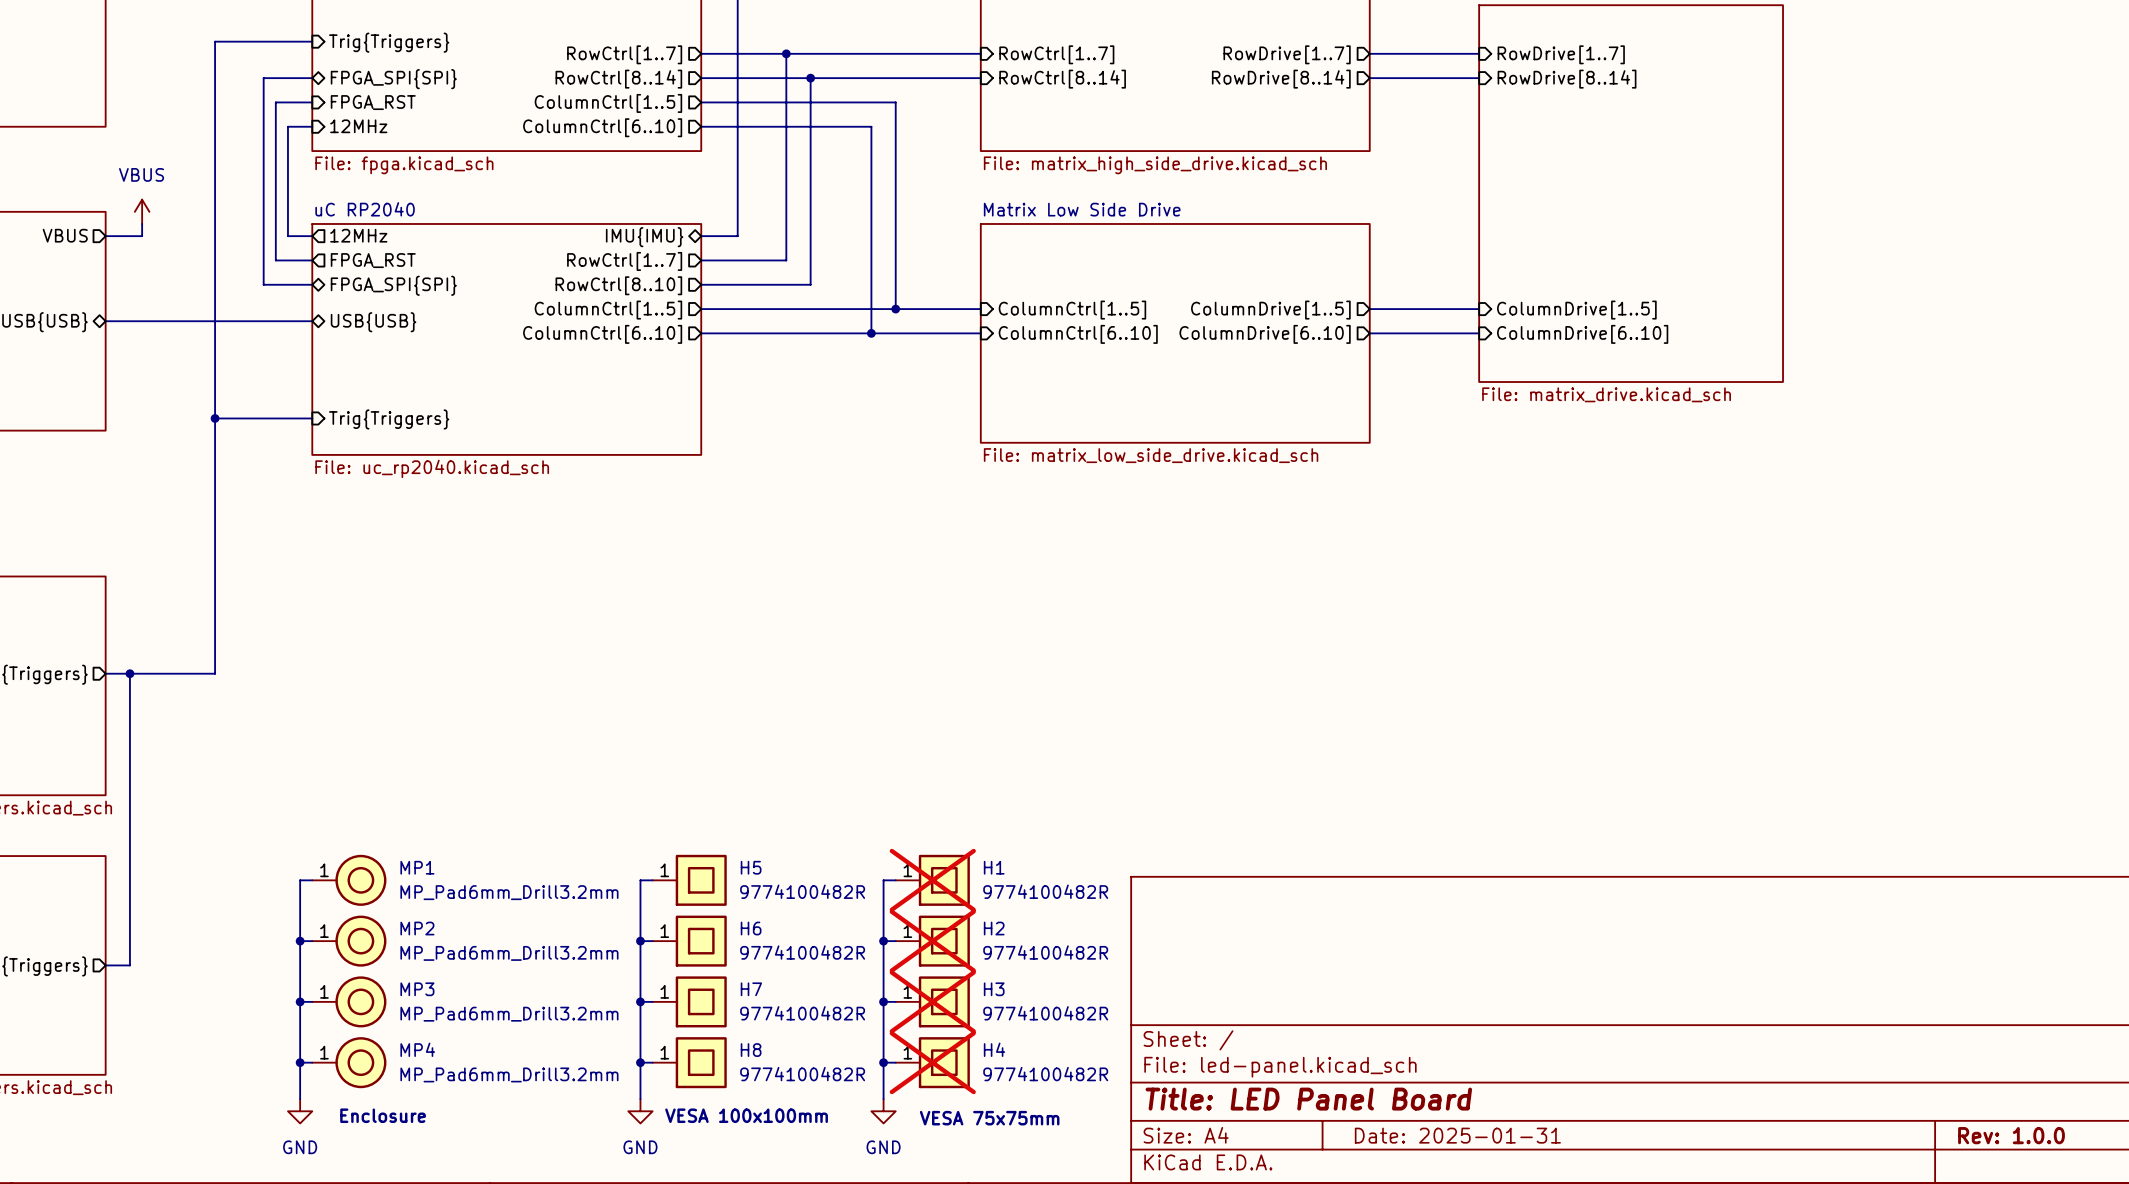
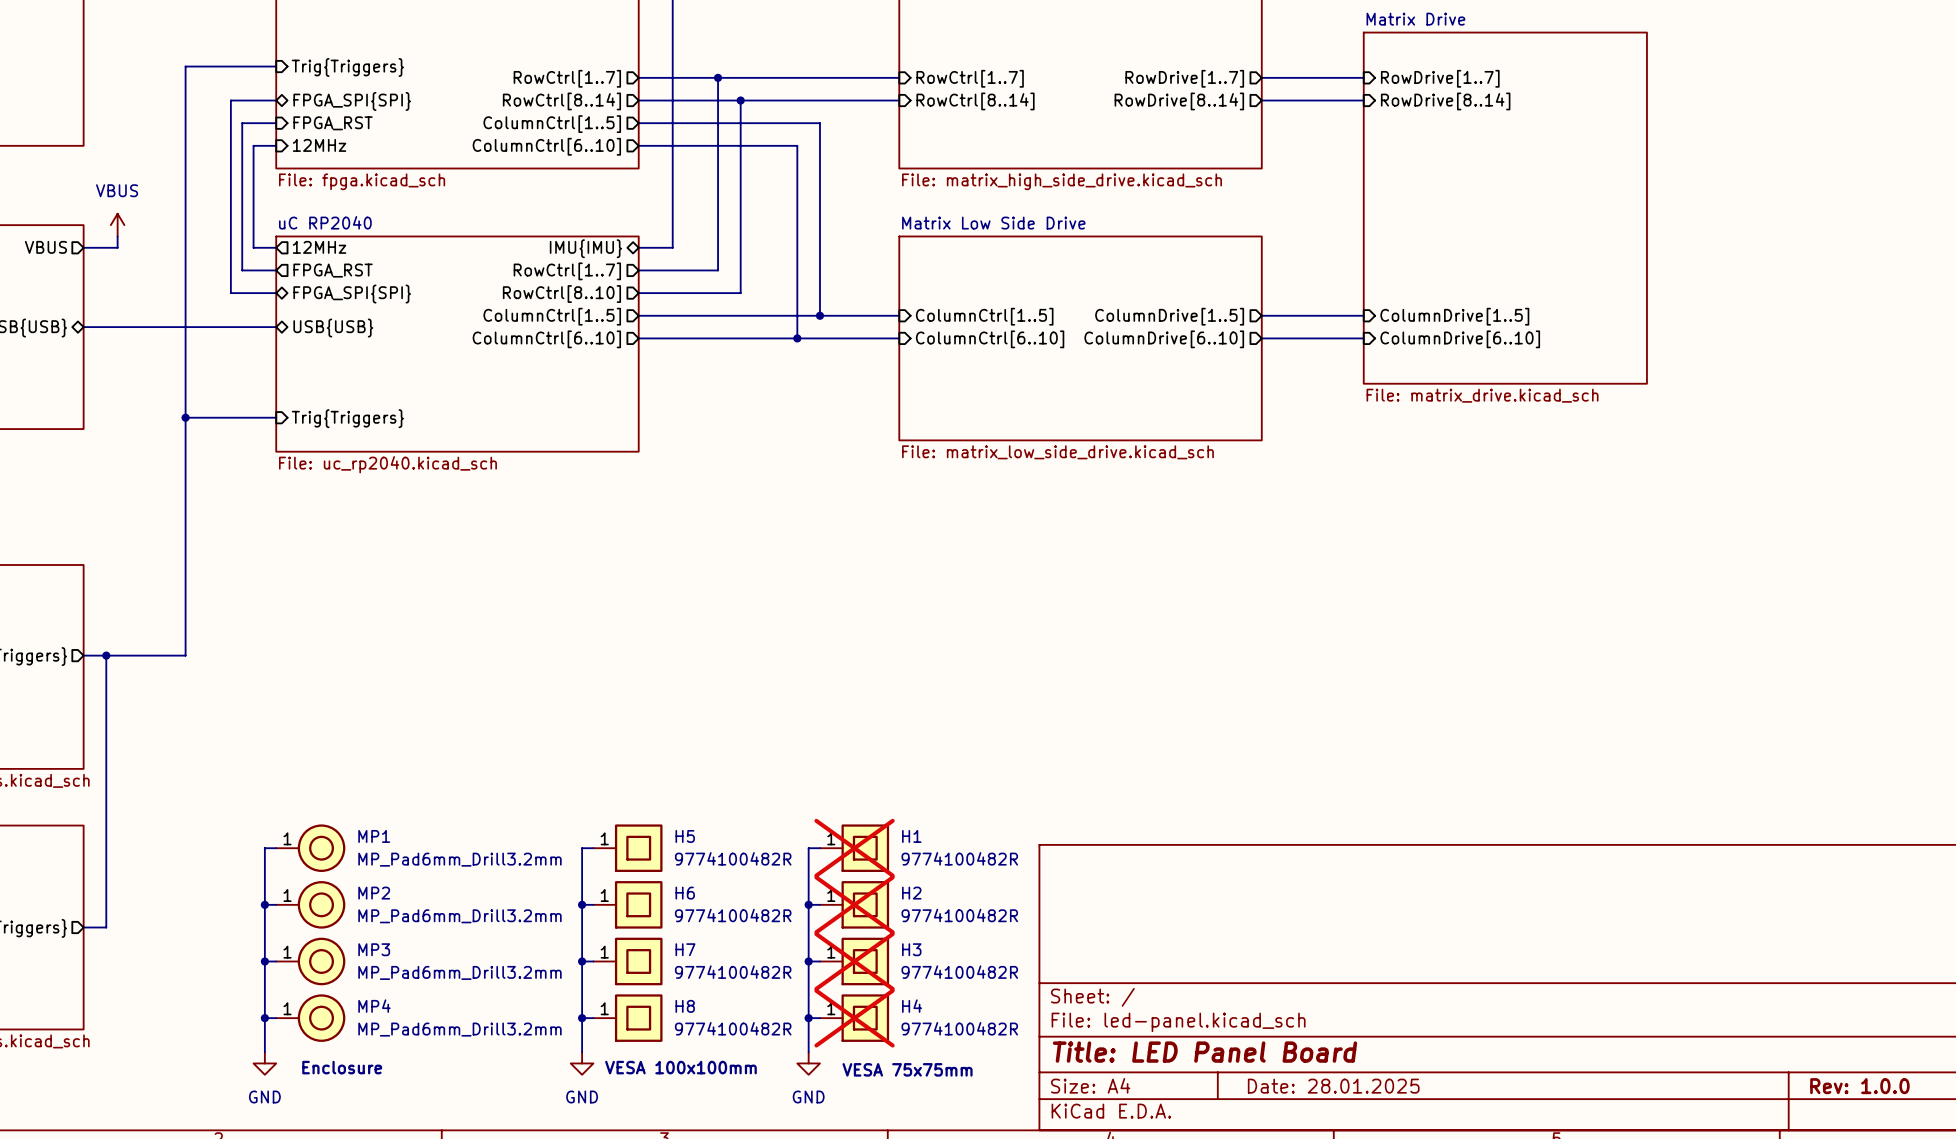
title block: Date: 2025-01-31 (1457, 1135) -> Date: 28.01.2025 (1333, 1086)

